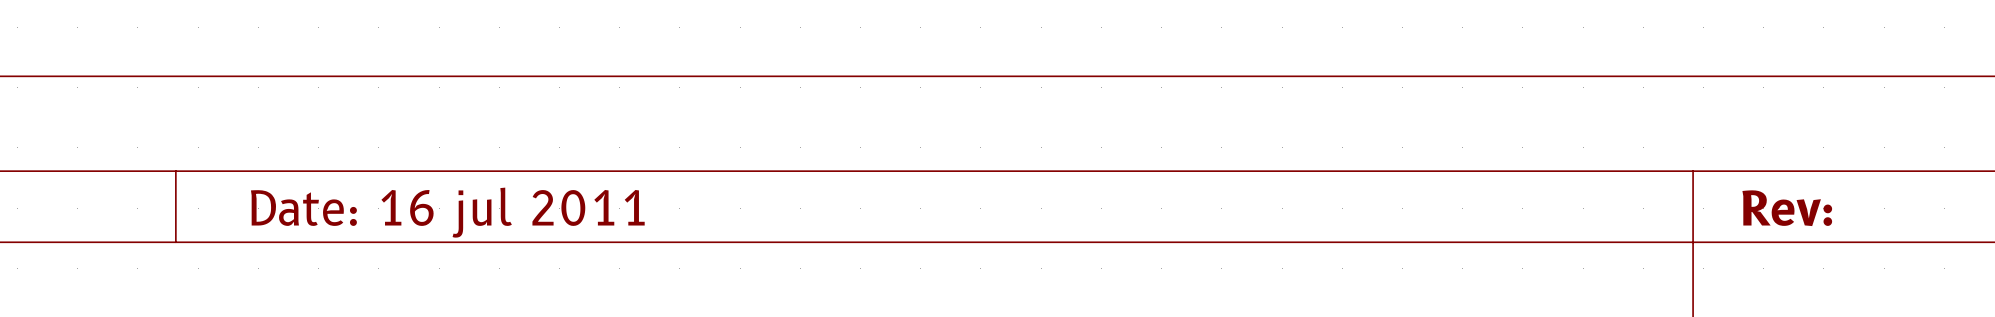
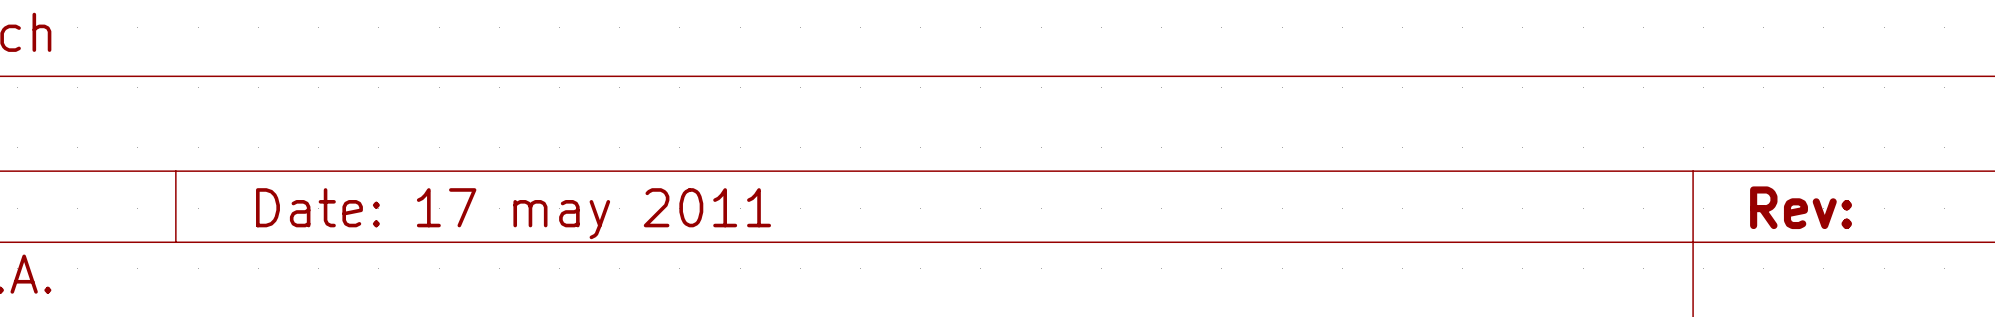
title block: Date: 16 jul 2011 (447, 212) -> Date: 17 may 2011 (513, 213)

